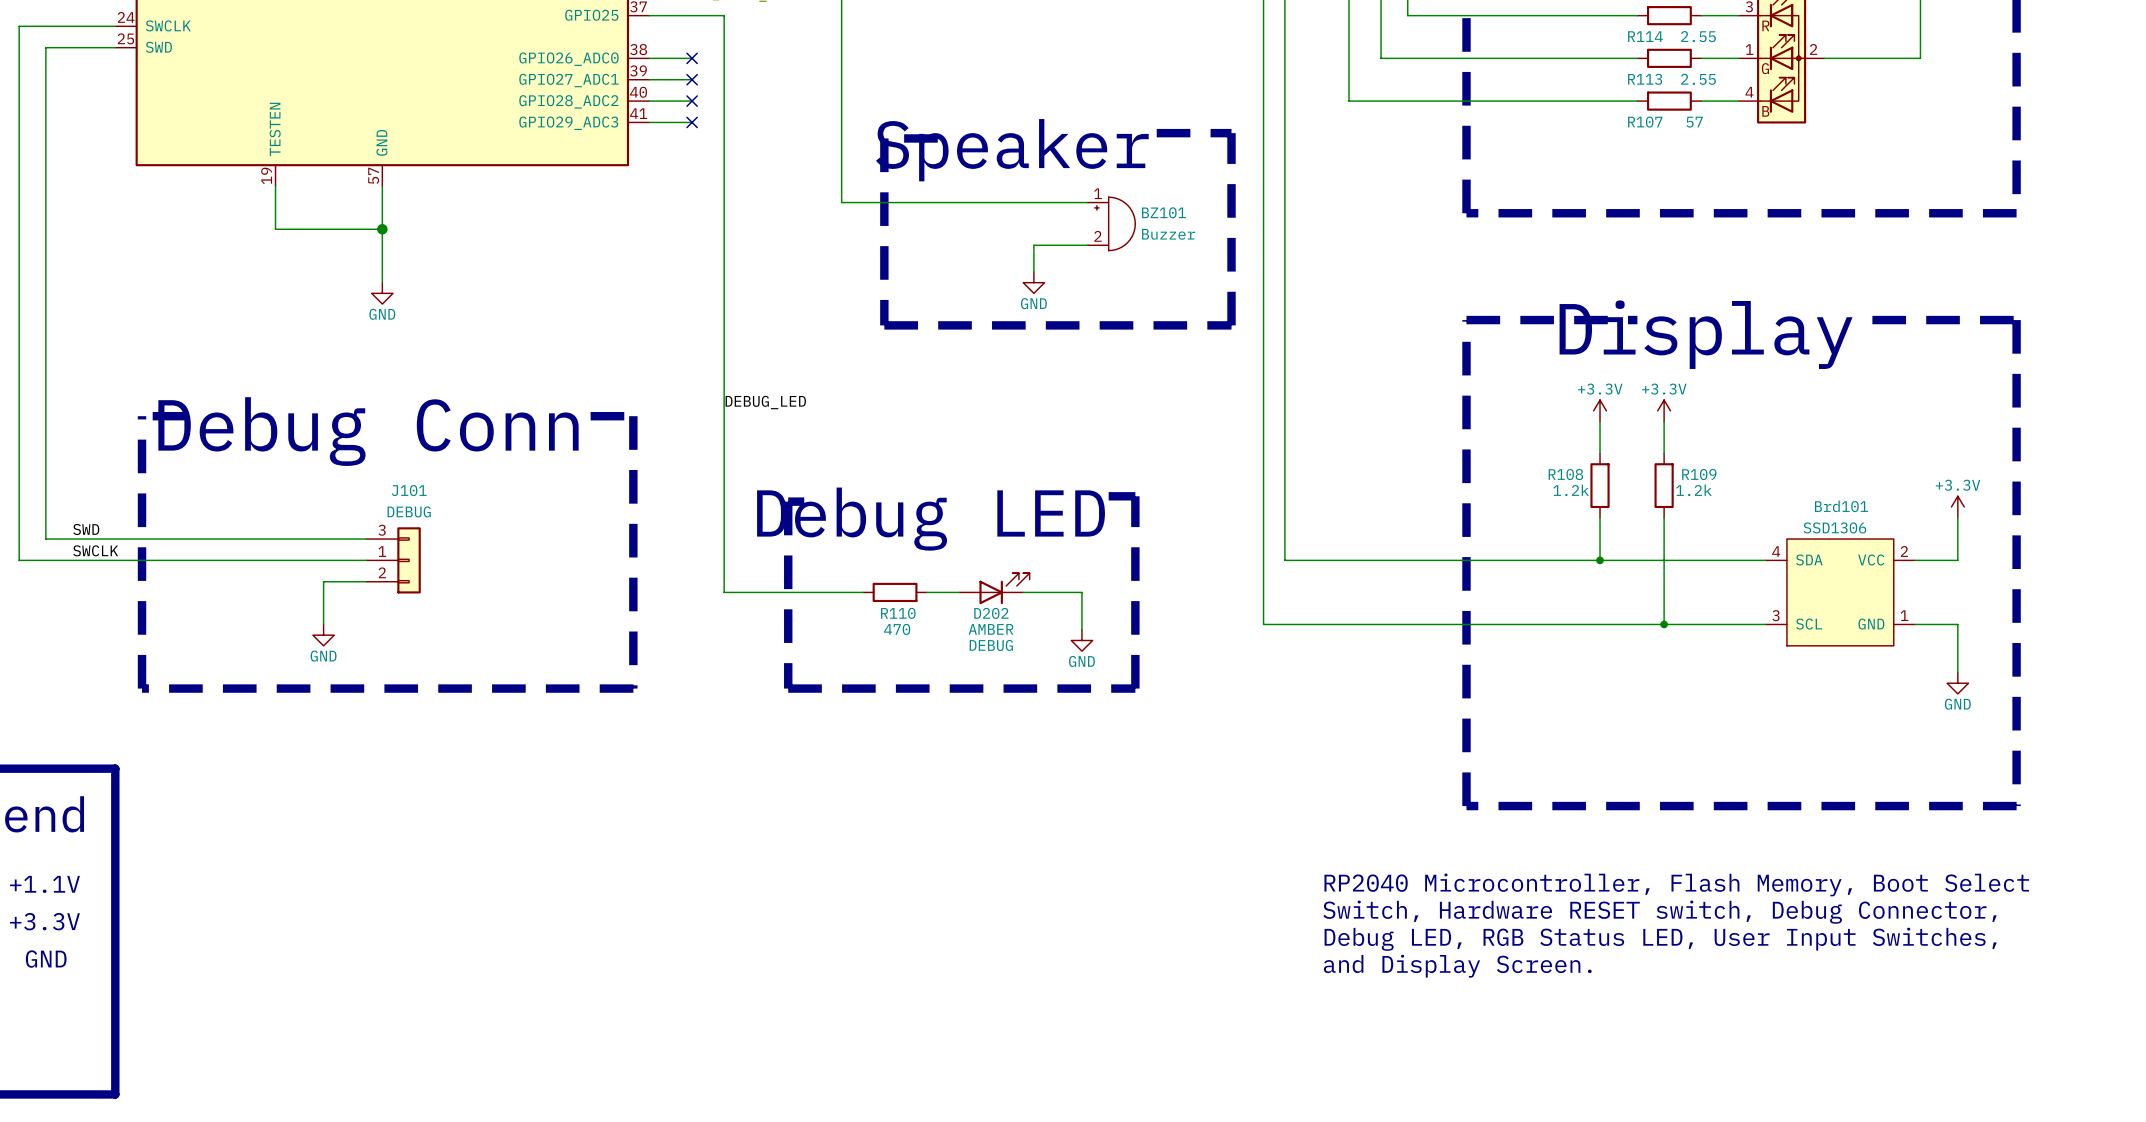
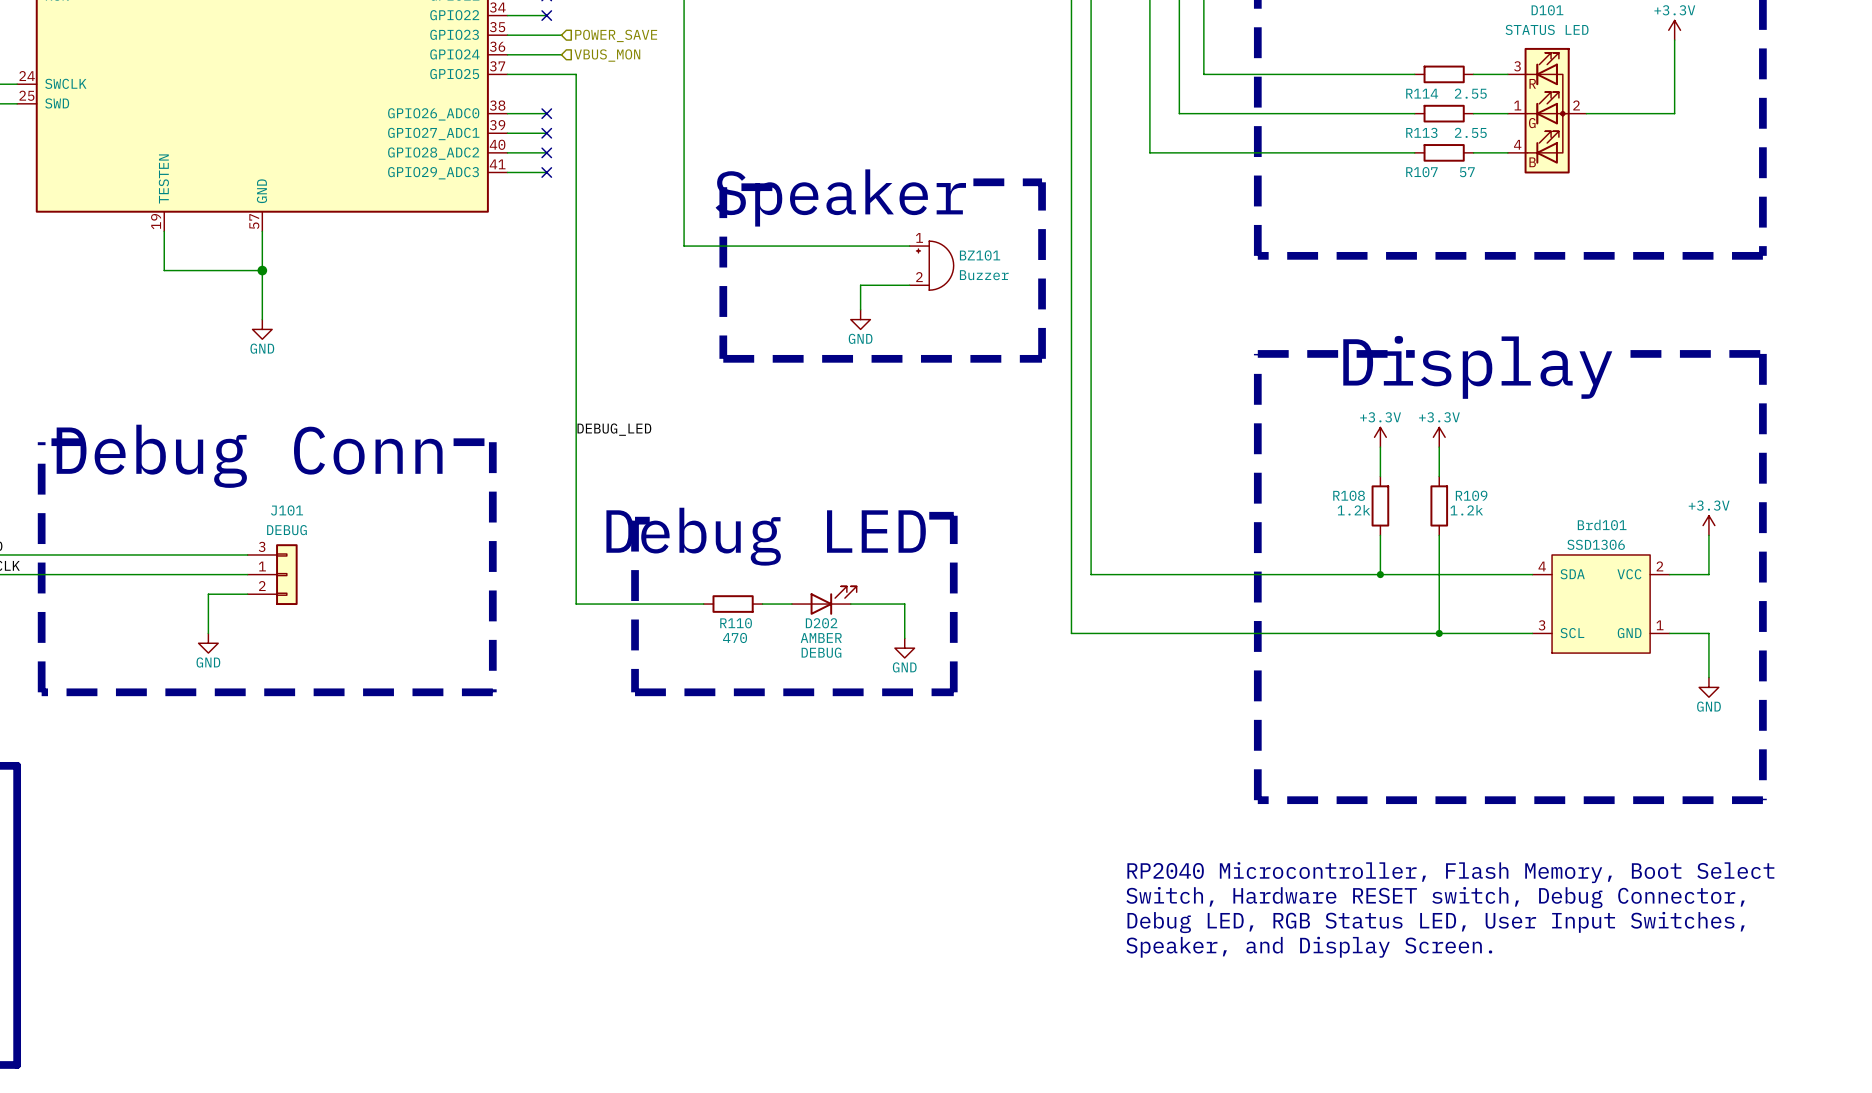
text: and Display Screen. (1457, 966) -> Speaker, and Display Screen. (1309, 947)

